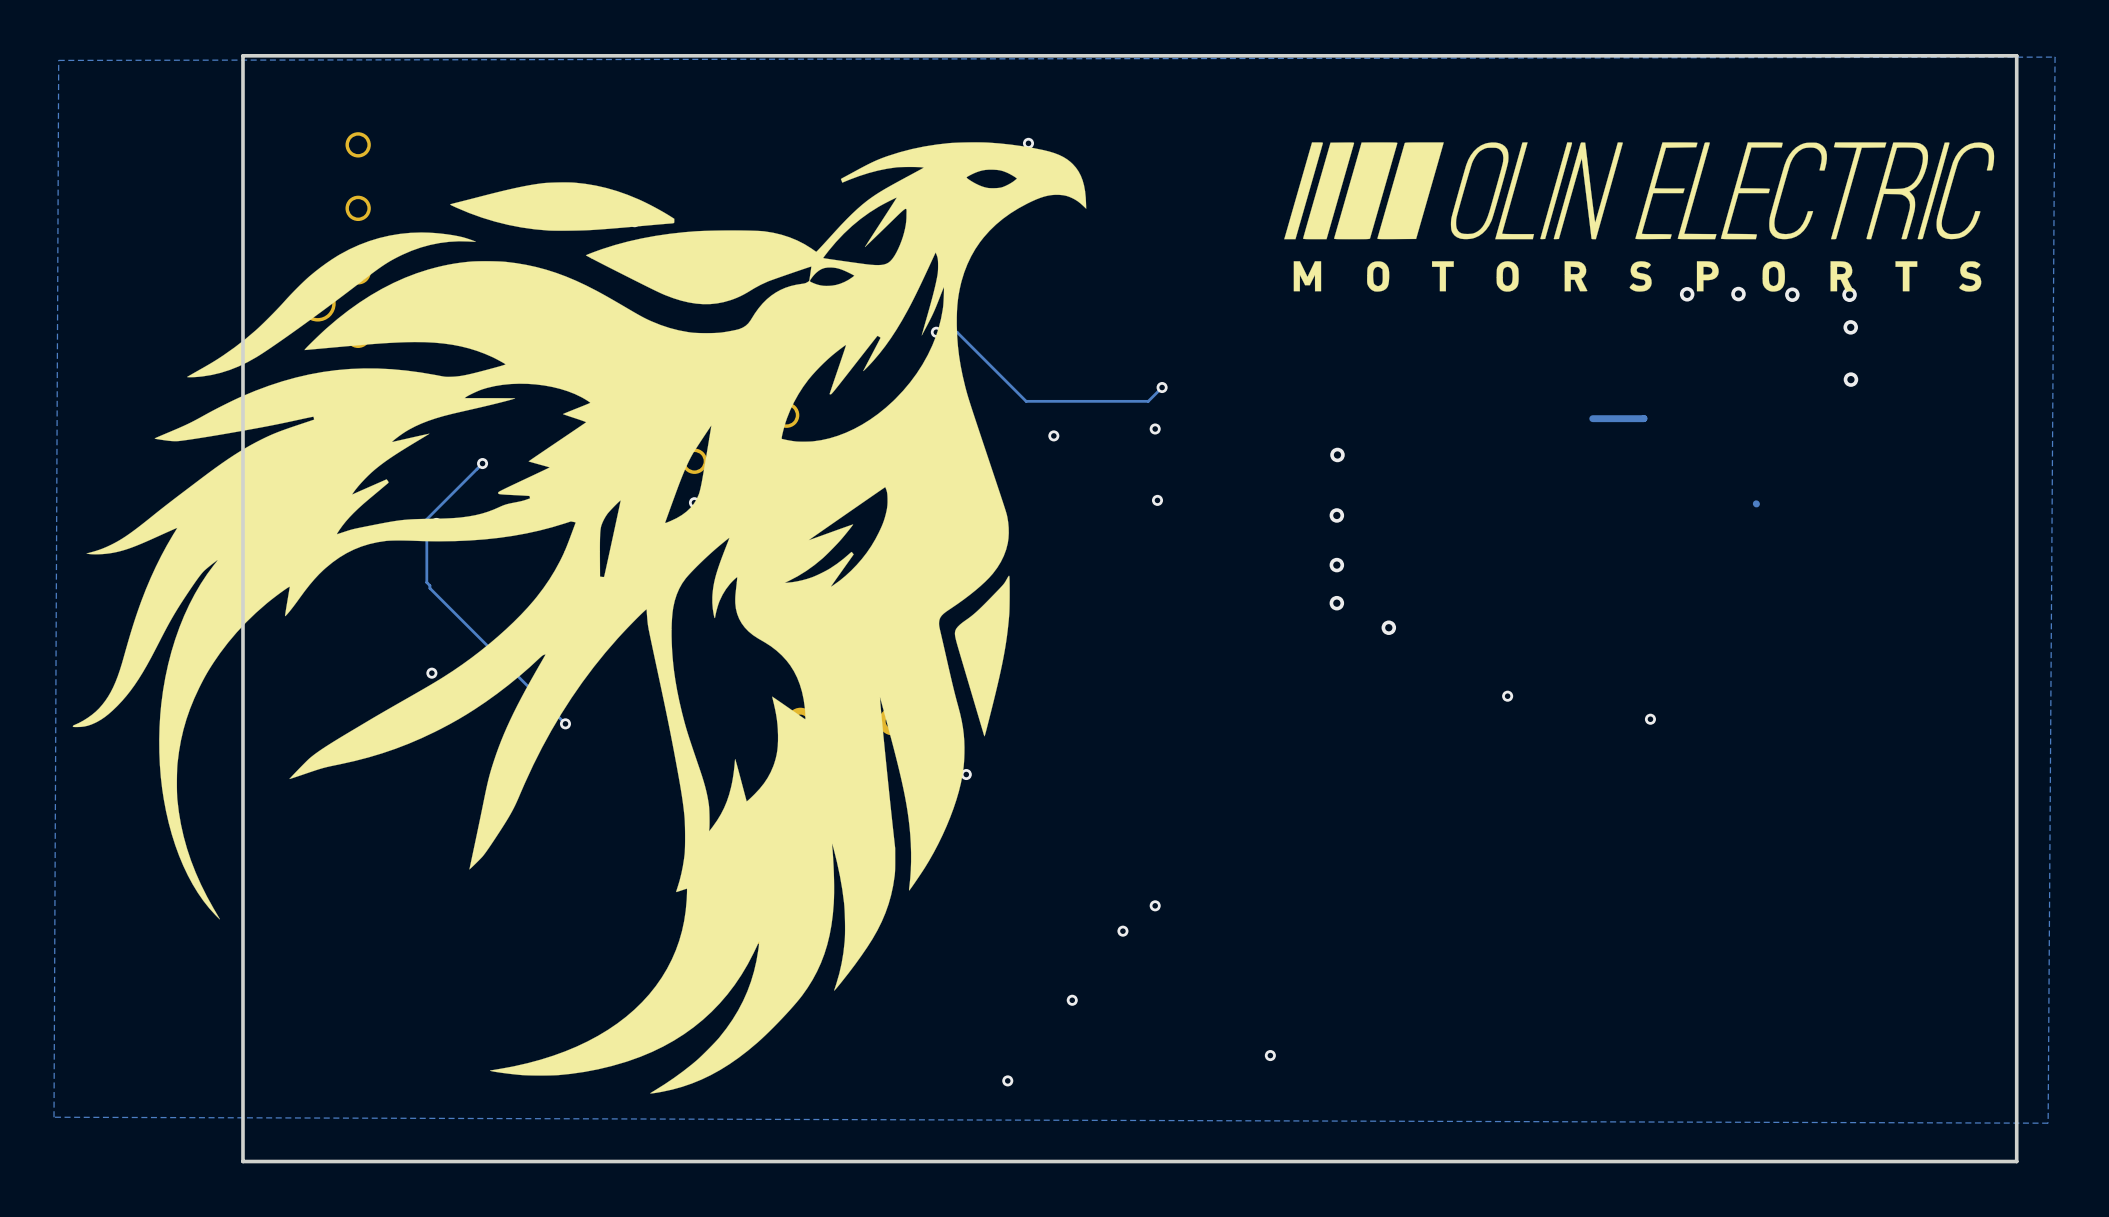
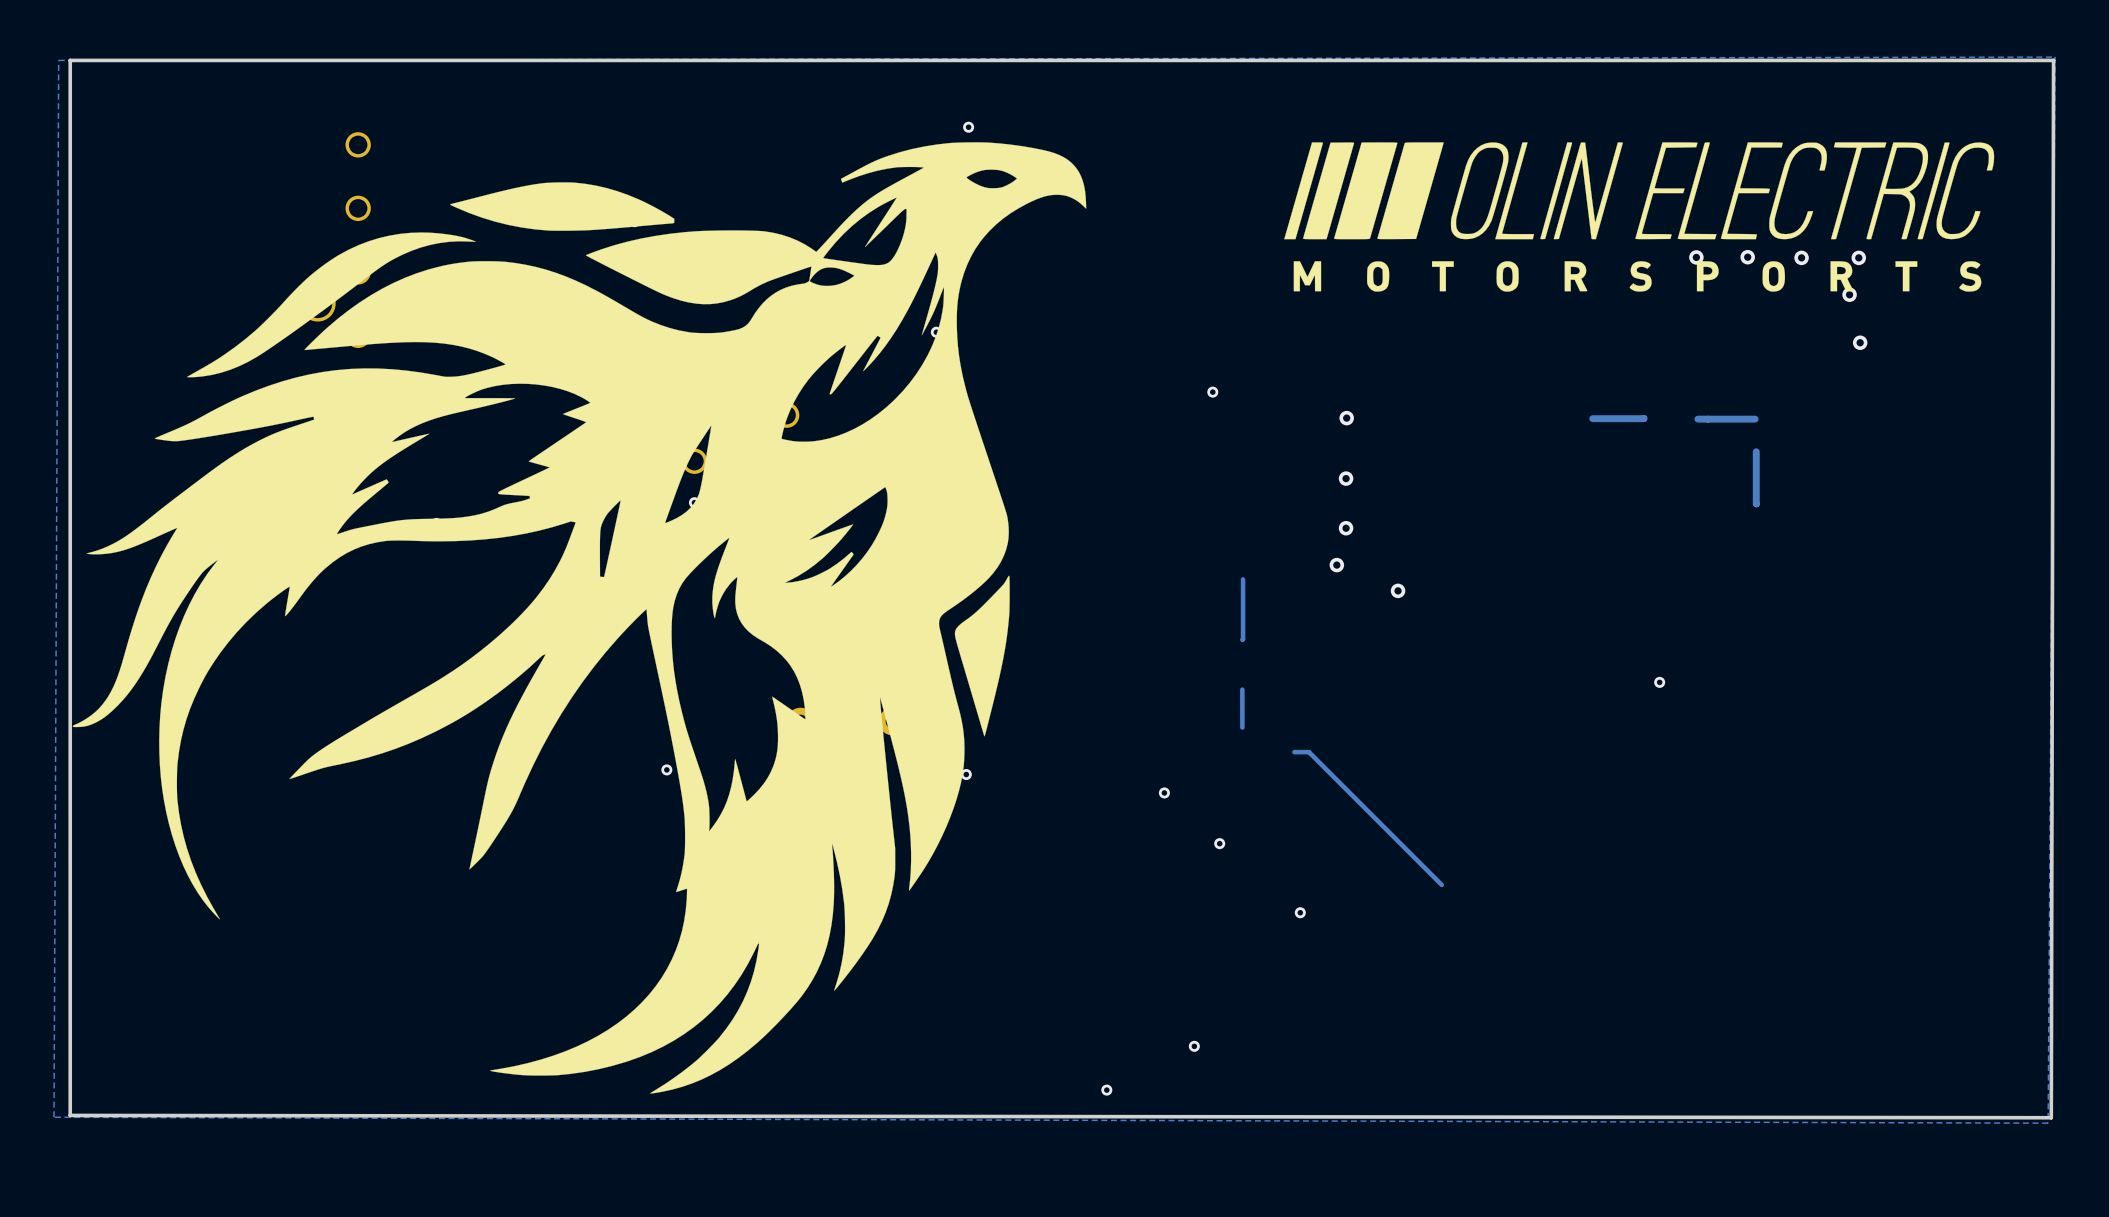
board edge: (2016, 55) (242, 55) (242, 1161) (2016, 1161) (2016, 55) -> (2053, 60) (2051, 1117) (70, 1115) (70, 60) (2053, 60)
via: none -> (968, 127)
via: (1028, 143) -> none
via: none -> (1696, 257)
via: none -> (1747, 257)
via: none -> (1801, 257)
via: none -> (1858, 257)
via: (1687, 294) -> none
via: (1738, 294) -> none
via: (1792, 294) -> none
via position: (1850, 327) -> (1860, 342)
track: (936, 332) (957, 332) (1026, 401) (1148, 401) (1162, 387) -> none
via: (1850, 379) -> none
via: (1162, 387) -> none
via: none -> (1212, 392)
via: none -> (1346, 418)
track: none -> (1755, 419) (1697, 419)
via: (1155, 428) -> none
via: (1053, 435) -> none
track: none -> (1756, 451) (1756, 503)
via: (1337, 454) -> none
track: (482, 463) (426, 519) (426, 582) (429, 588) (565, 723) -> none
via: (482, 463) -> none
via: none -> (1346, 478)
via: (1157, 500) -> none
via position: (1336, 515) -> (1346, 528)
track: none -> (1243, 579) (1242, 639)
via: none -> (1398, 590)
via: (1336, 603) -> none
via: (1388, 627) -> none
via: (431, 673) -> none
track: none -> (1242, 689) (1242, 727)
via: (1507, 696) -> none
via position: (1650, 719) -> (1659, 682)
via: (565, 723) -> none
track: none -> (1294, 752) (1308, 752) (1441, 884)
via: none -> (666, 769)
via: none -> (1164, 792)
via: none -> (1219, 843)
via: (1155, 905) -> none
via: none -> (1300, 912)
via: (1122, 931) -> none
via: (1072, 1000) -> none
via: none -> (1194, 1046)
via: (1270, 1055) -> none
via: (1007, 1080) -> none
via: none -> (1106, 1090)

